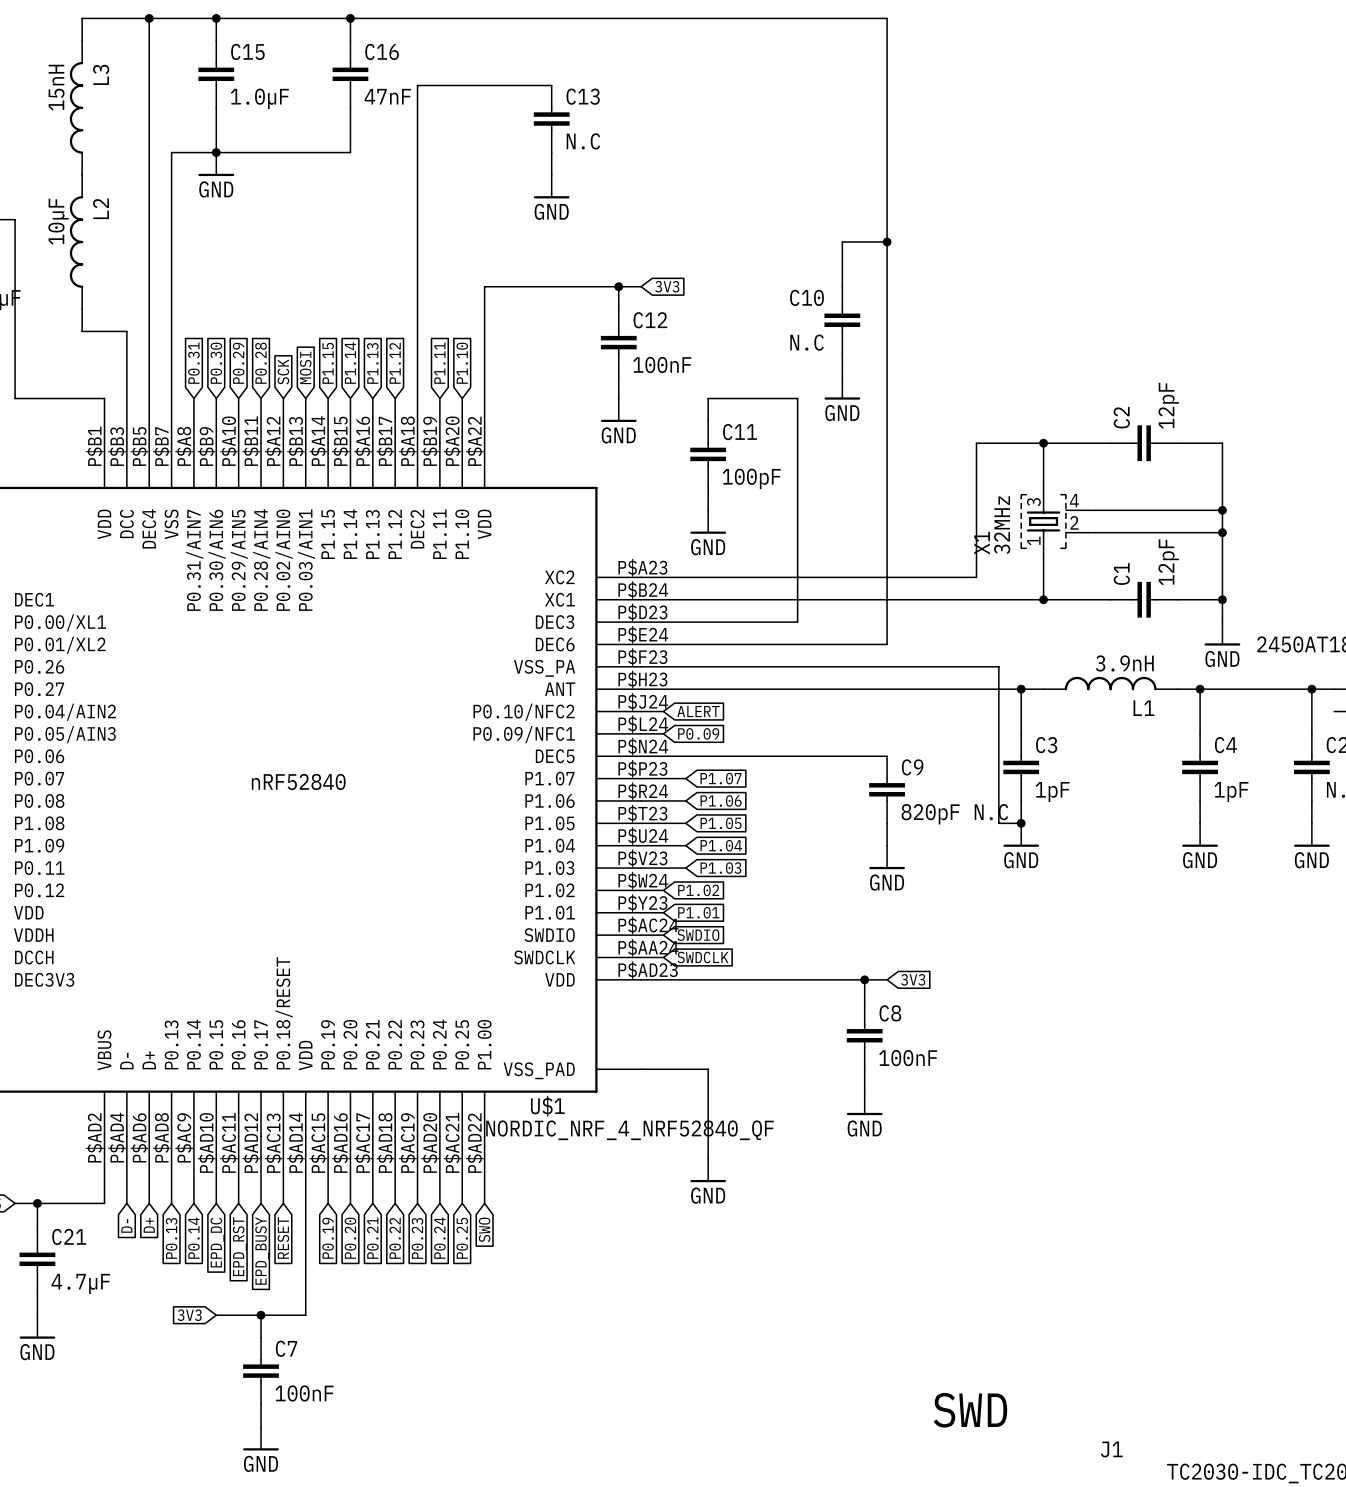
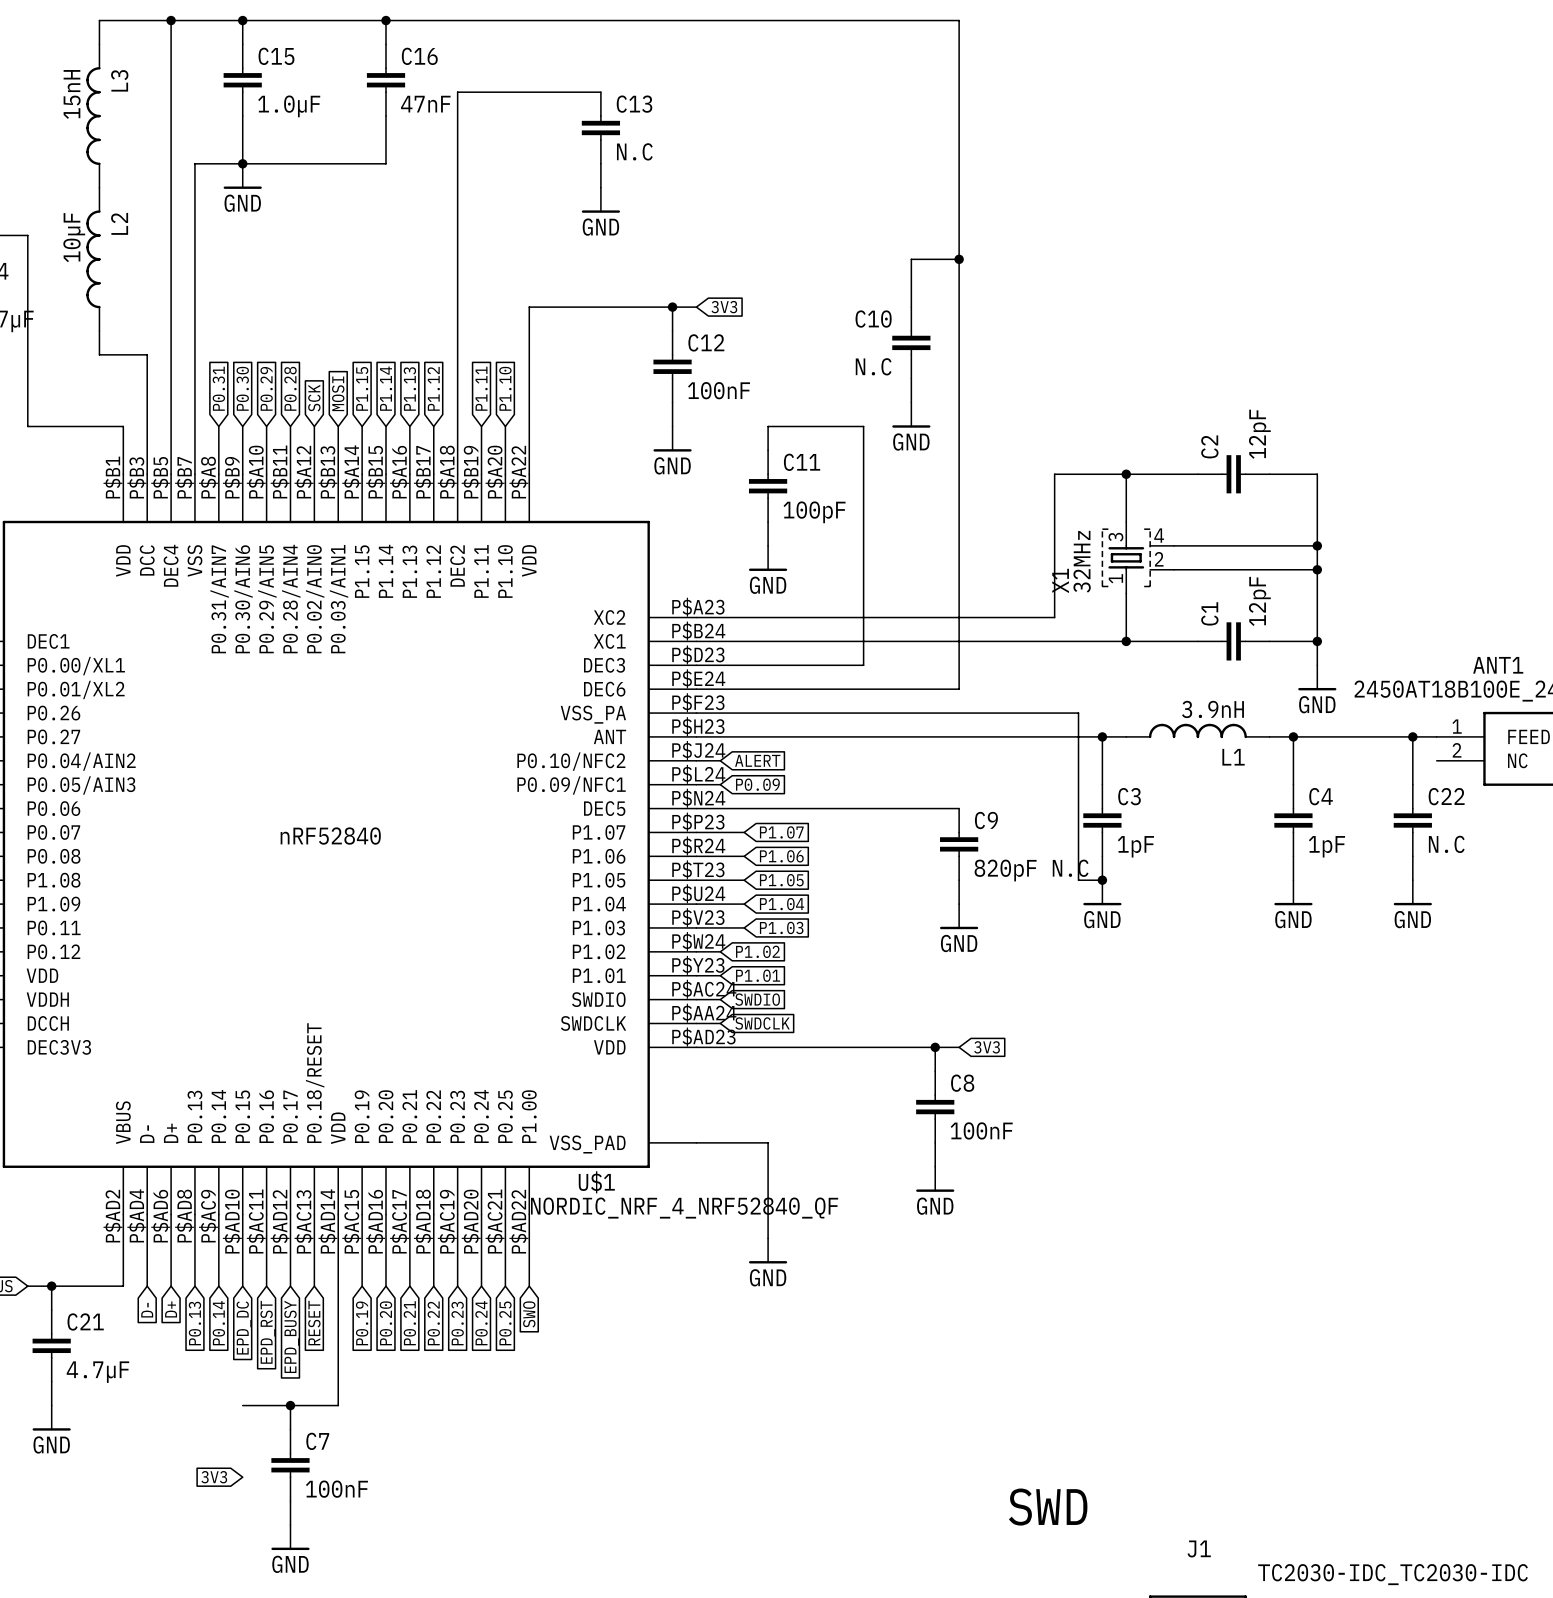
global label position: 3V3 (189, 1315) -> 3V3 (214, 1477)

